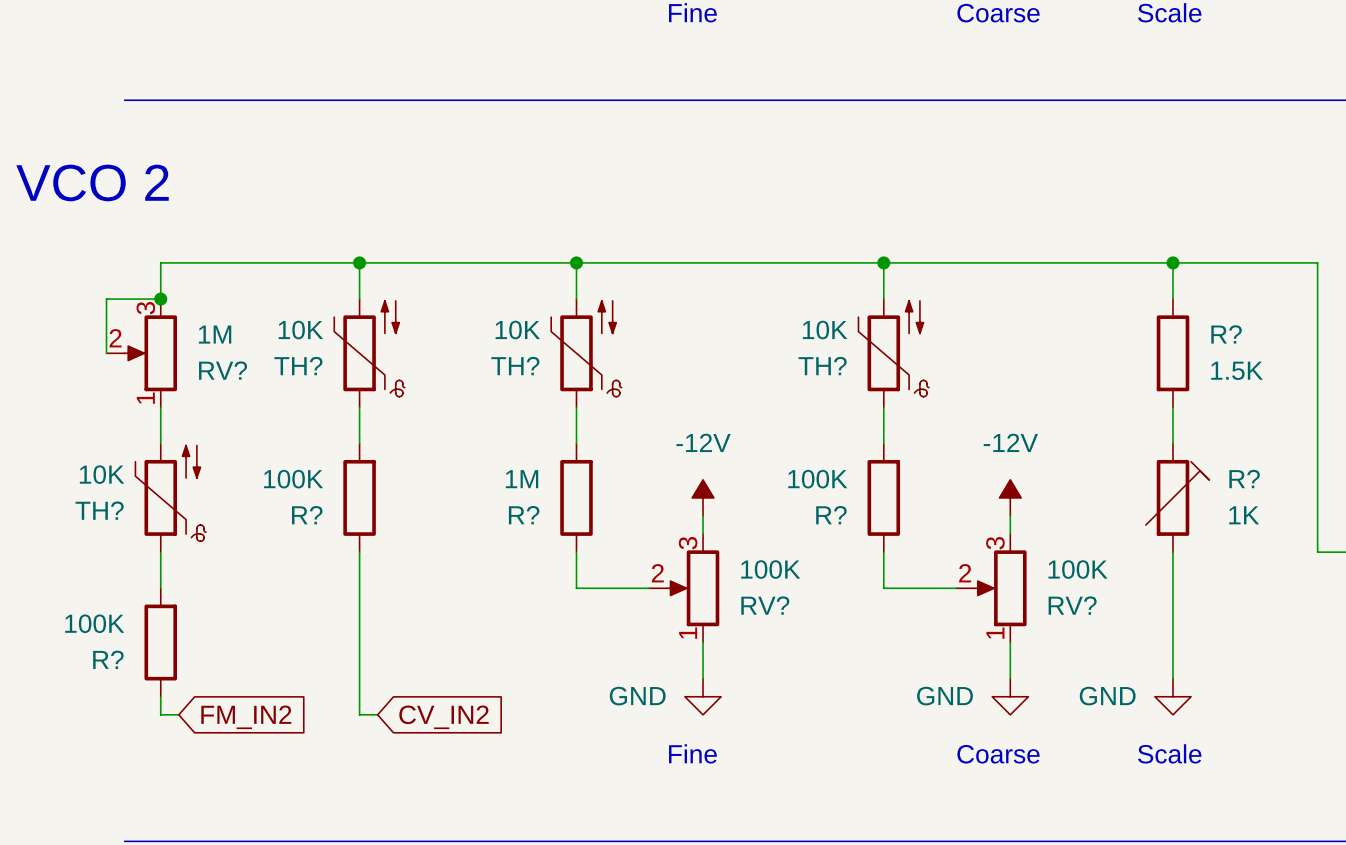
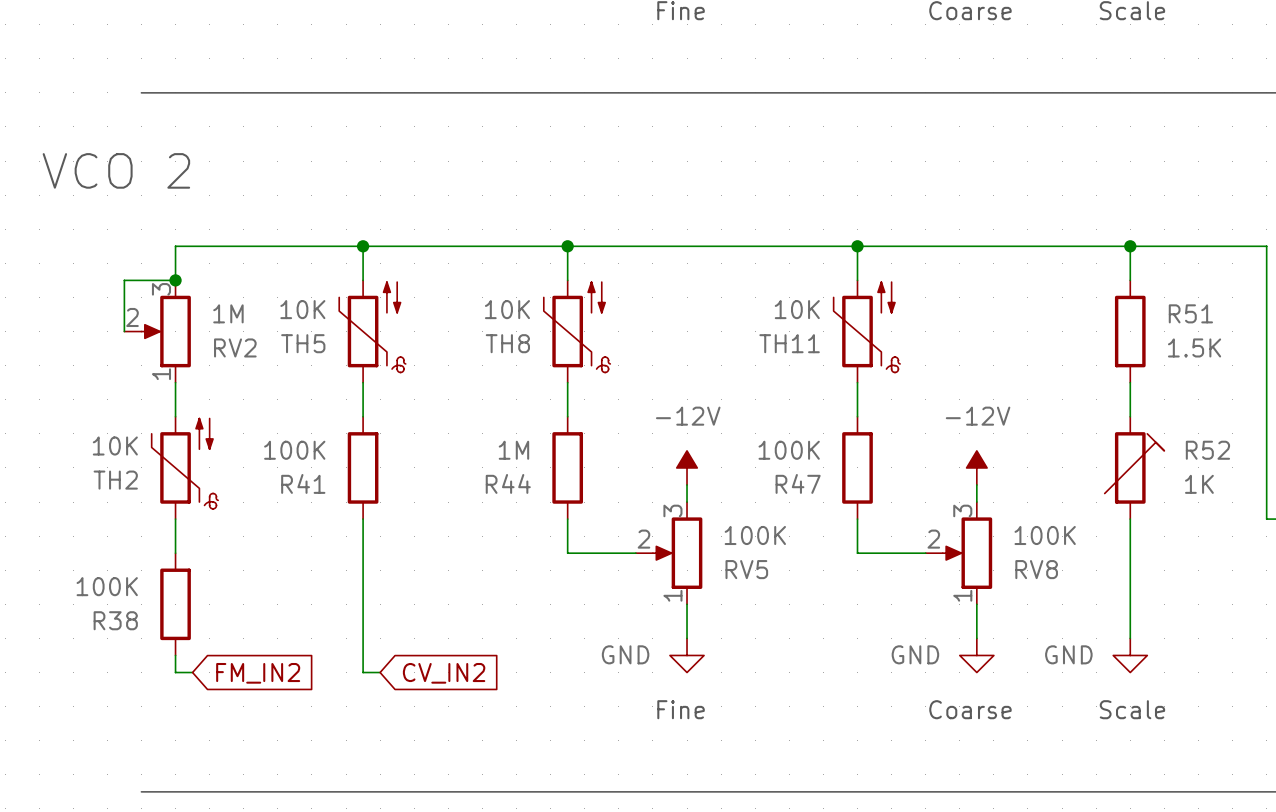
R? name: R? (1226, 334) -> R51 (1190, 313)
TH? name: TH? (298, 366) -> TH5 (303, 343)
TH? name: TH? (515, 366) -> TH8 (507, 343)
TH? name: TH? (822, 366) -> TH11 (789, 343)
RV? name: RV? (223, 370) -> RV2 (235, 347)
R? name: R? (1244, 479) -> R52 (1207, 450)
TH? name: TH? (99, 510) -> TH2 (115, 480)
R? name: R? (307, 515) -> R41 (303, 483)
R? name: R? (524, 515) -> R44 (508, 483)
R? name: R? (831, 515) -> R47 (798, 483)
RV? name: RV? (765, 605) -> RV5 (746, 569)
RV? name: RV? (1072, 605) -> RV8 (1036, 569)
R? name: R? (108, 659) -> R38 (115, 620)

